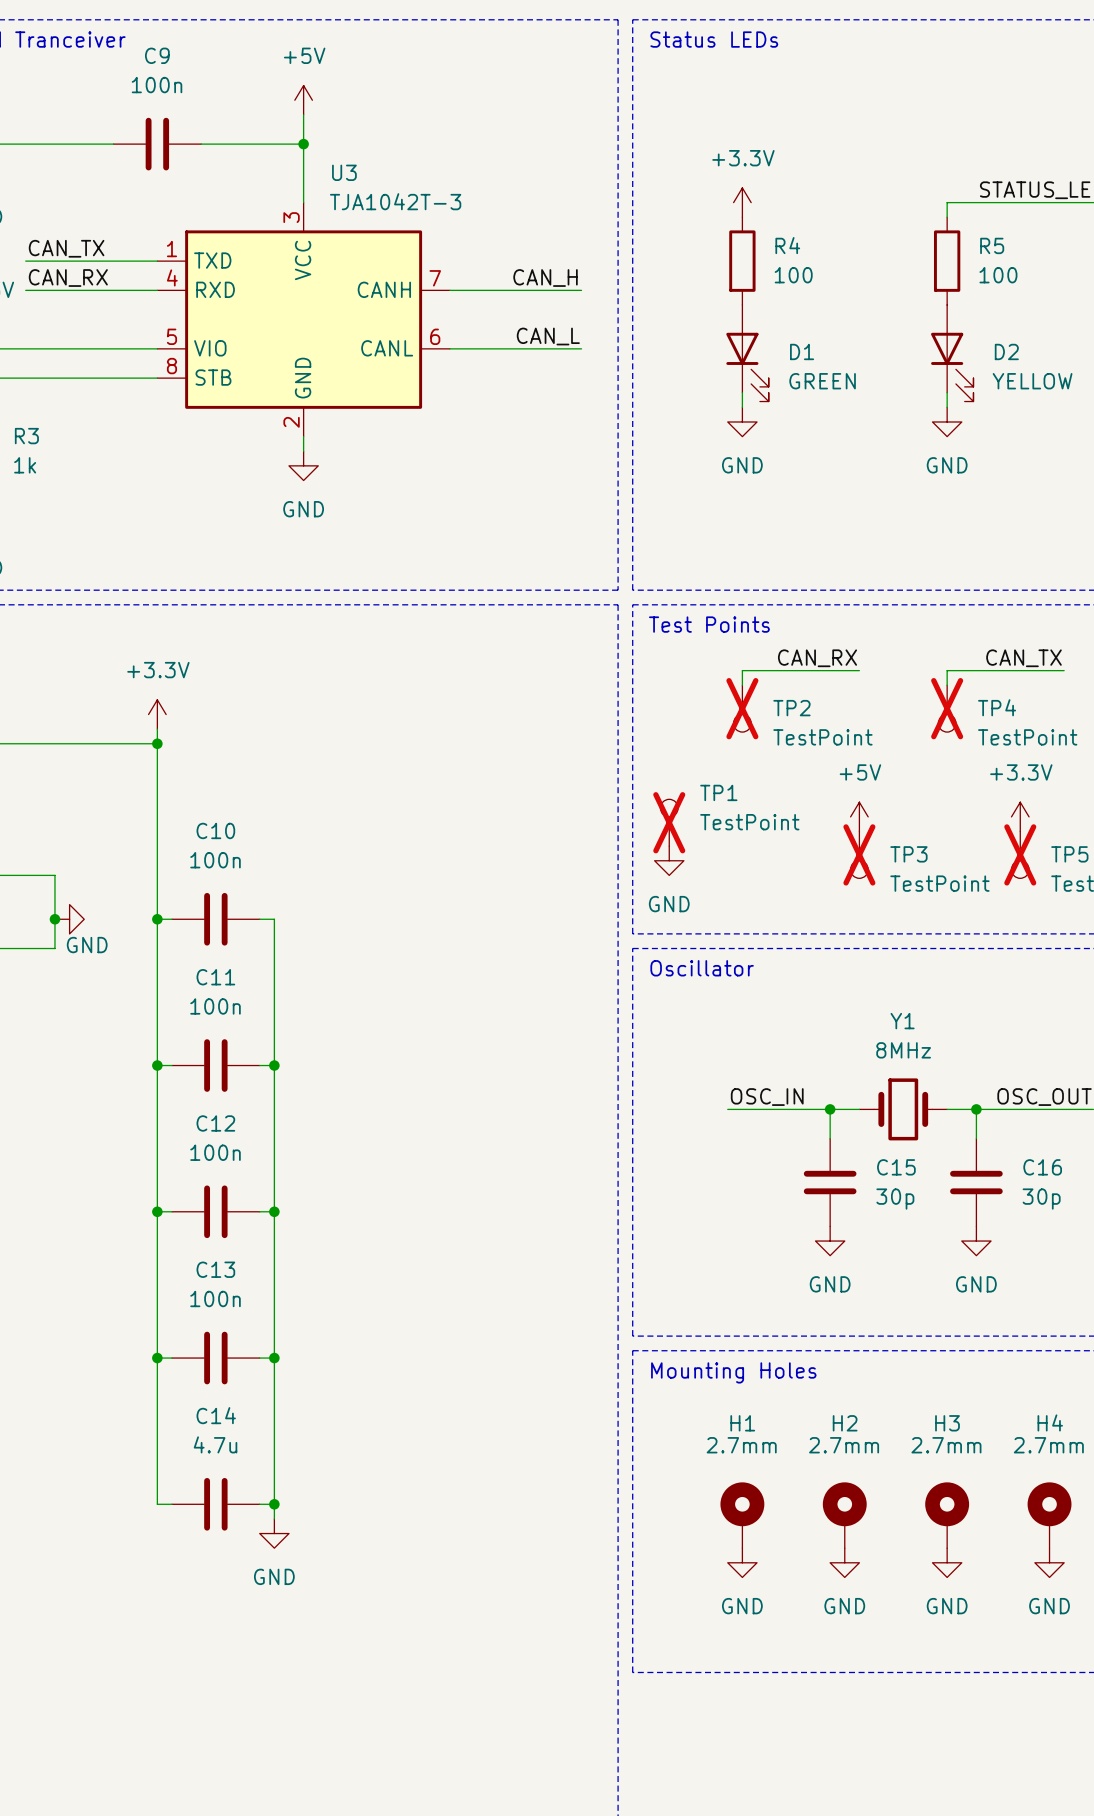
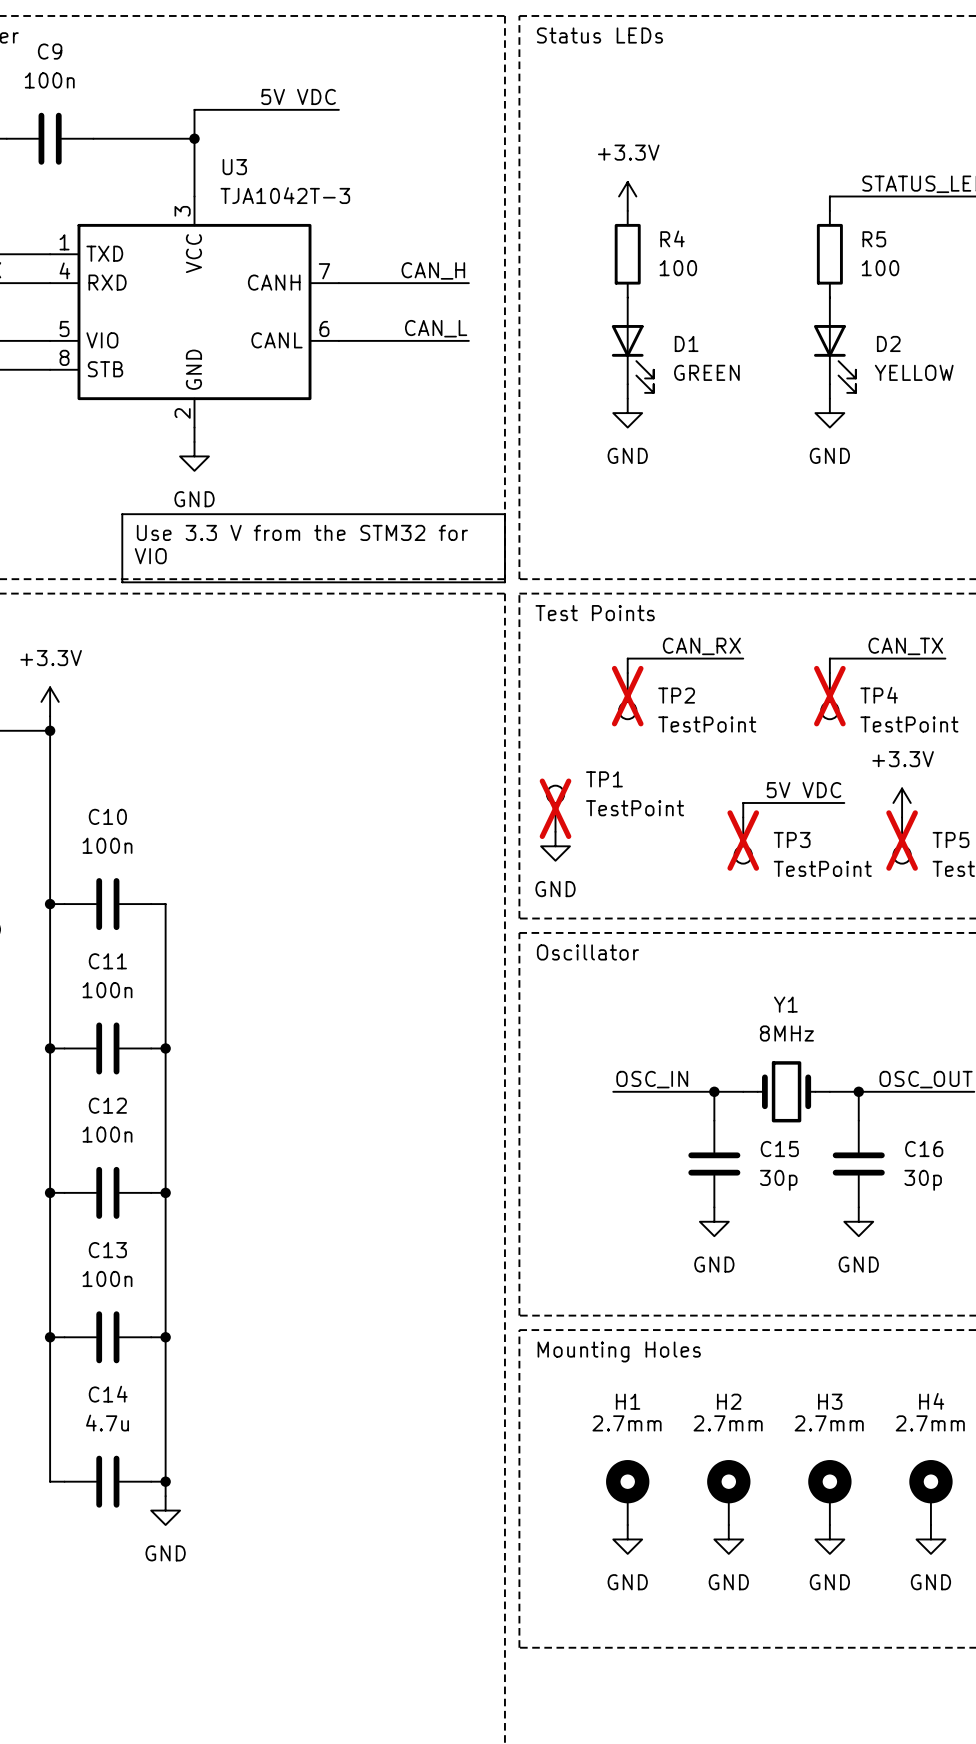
power symbol: +5V (303, 100) -> none
label: none -> 5V VDC (298, 96)
wire: none -> (194, 109) (338, 109)
line: none -> (122, 514) (504, 514) (504, 582) (122, 582) (122, 514)
text: none -> Use 3.3 V from the STM32 for (302, 532)
text: none -> VIO (150, 556)
label: none -> 5V VDC (803, 790)
power symbol: +5V (859, 816) -> none
wire: none -> (844, 802) (743, 802) (743, 817)

